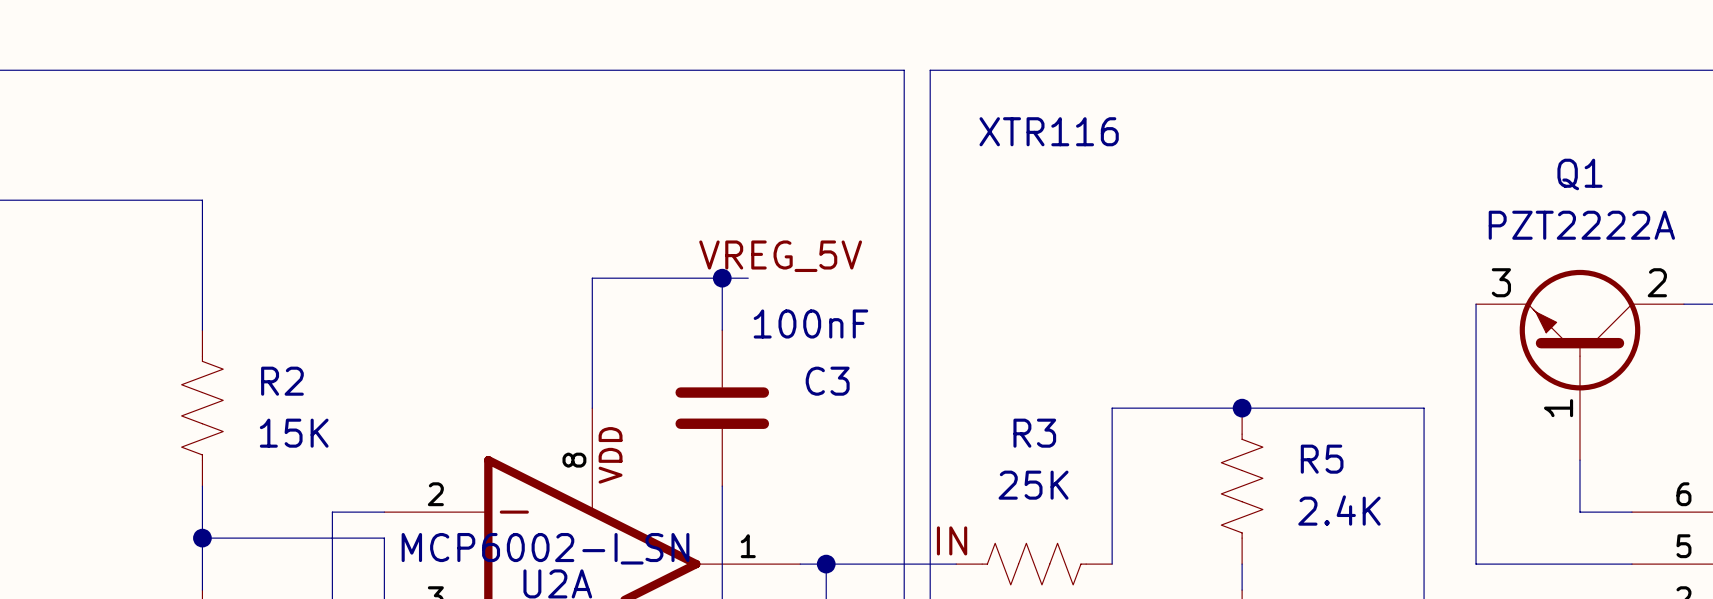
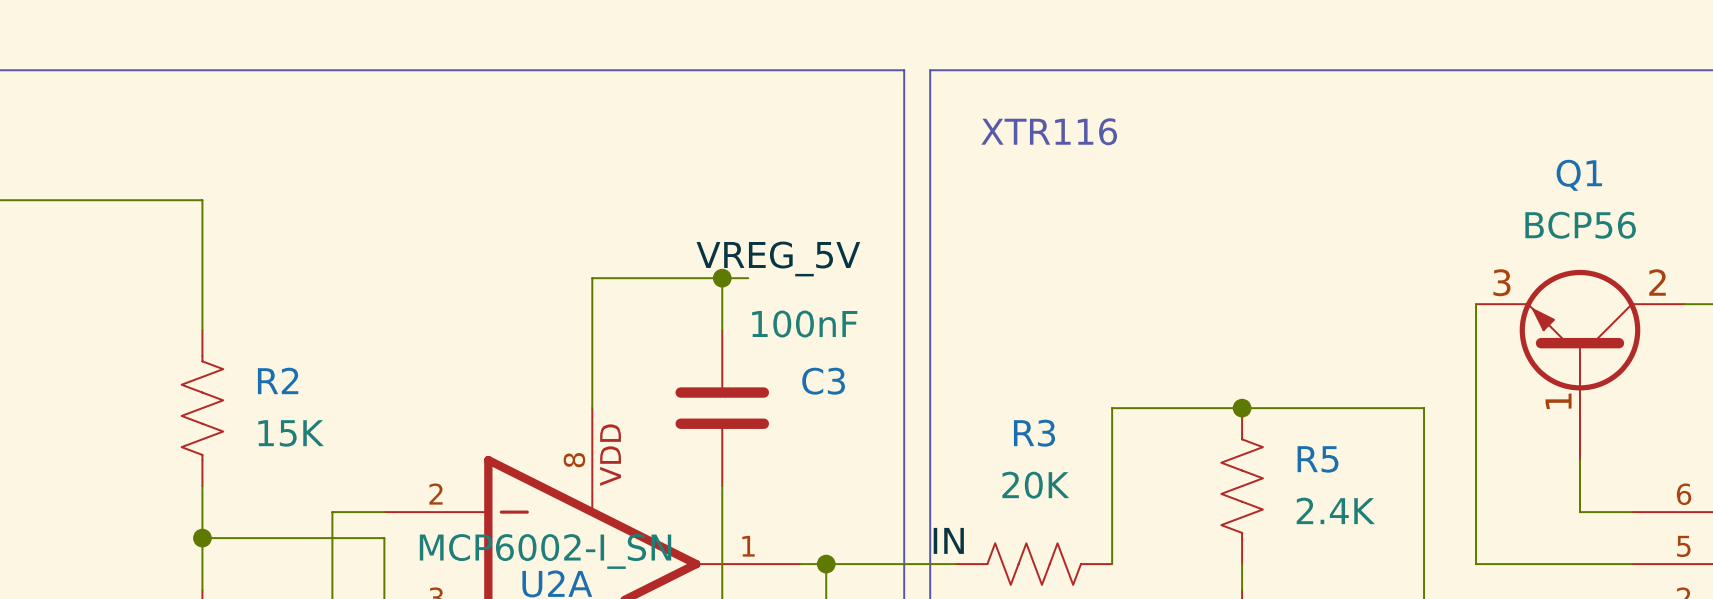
Q1 value: PZT2222A (1581, 225) -> BCP56 (1580, 225)
Q1 symbol: [1476, 269, 1684, 461] -> [1476, 269, 1684, 461]
R3 value: 25K (1033, 485) -> 20K (1035, 485)

